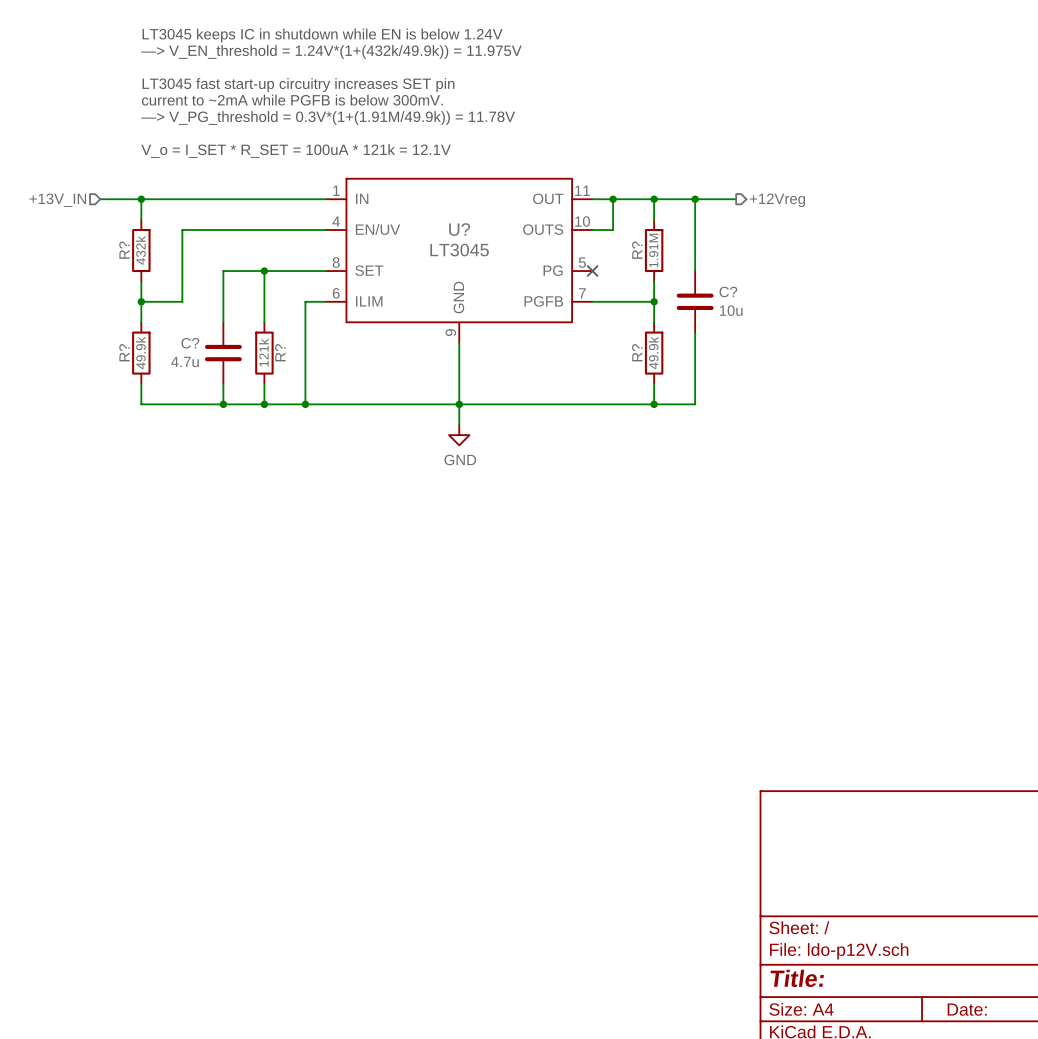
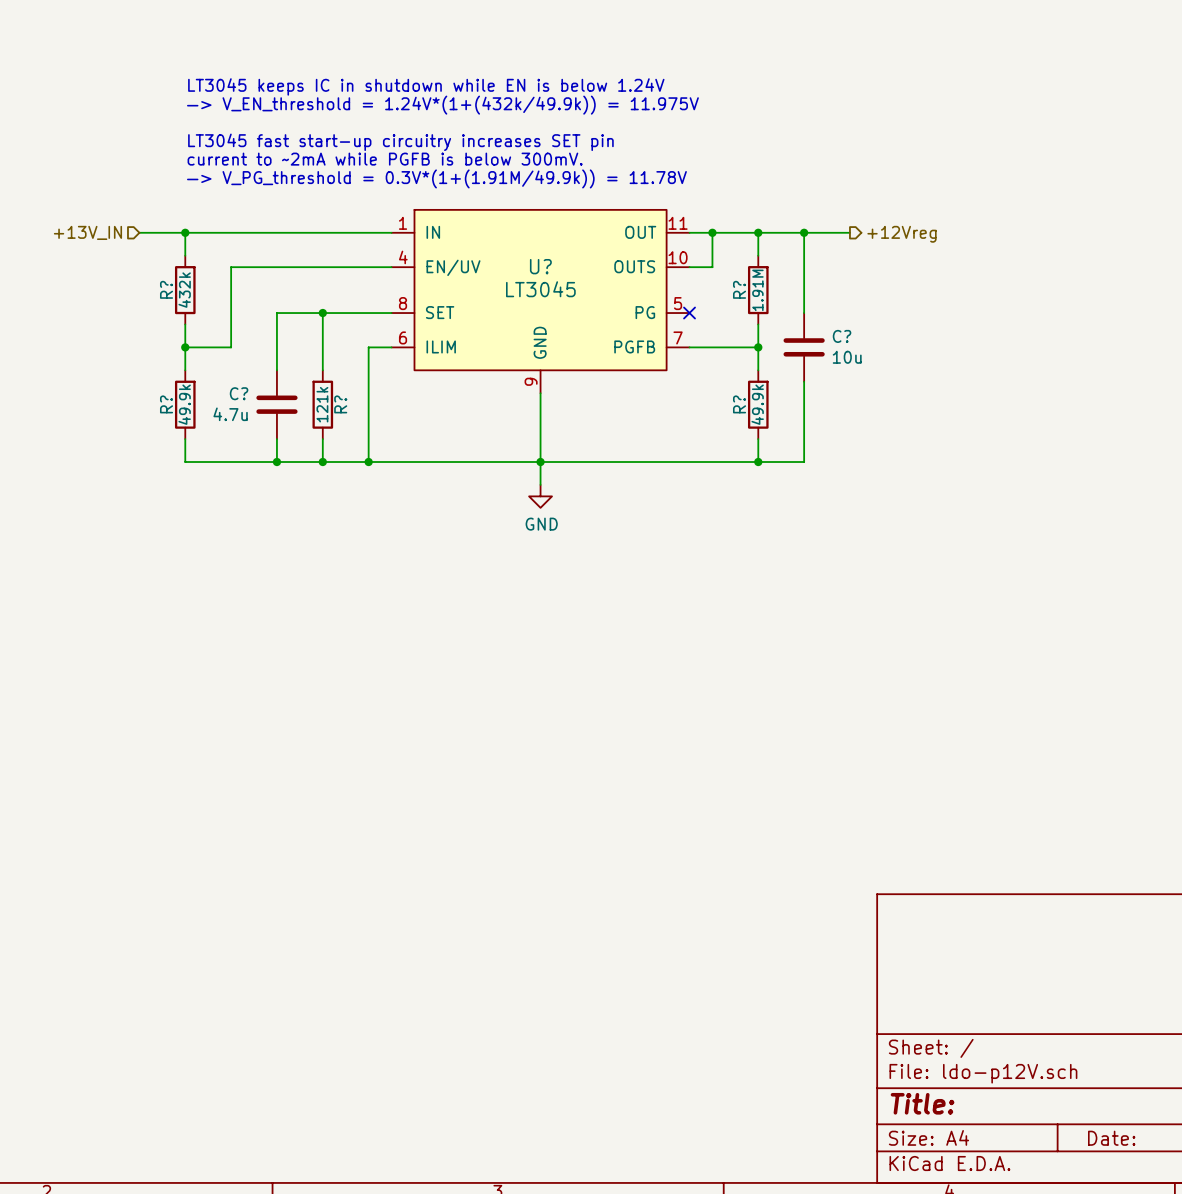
text position: LT3045 keeps IC in shutdown while EN is below 1.24V (322, 35) -> LT3045 keeps IC in shutdown while EN is below 1.24V (426, 86)
text: —> V_EN_threshold = 1.24V*(1+(432k/49.9k)) = 11.975V (331, 52) -> none
text: LT3045 fast start-up circuitry increases SET pin (298, 85) -> —> V_EN_threshold = 1.24V*(1+(432k/49.9k)) = 11.975V (442, 105)
text position: current to ~2mA while PGFB is below 300mV. (292, 100) -> current to ~2mA while PGFB is below 300mV. (385, 159)
text: —> V_PG_threshold = 0.3V*(1+(1.91M/49.9k)) = 11.78V (328, 118) -> LT3045 fast start-up circuitry increases SET pin (400, 142)
text: V_o = I_SET * R_SET = 100uA * 121k = 12.1V (296, 151) -> —> V_PG_threshold = 0.3V*(1+(1.91M/49.9k)) = 11.78V (436, 178)

